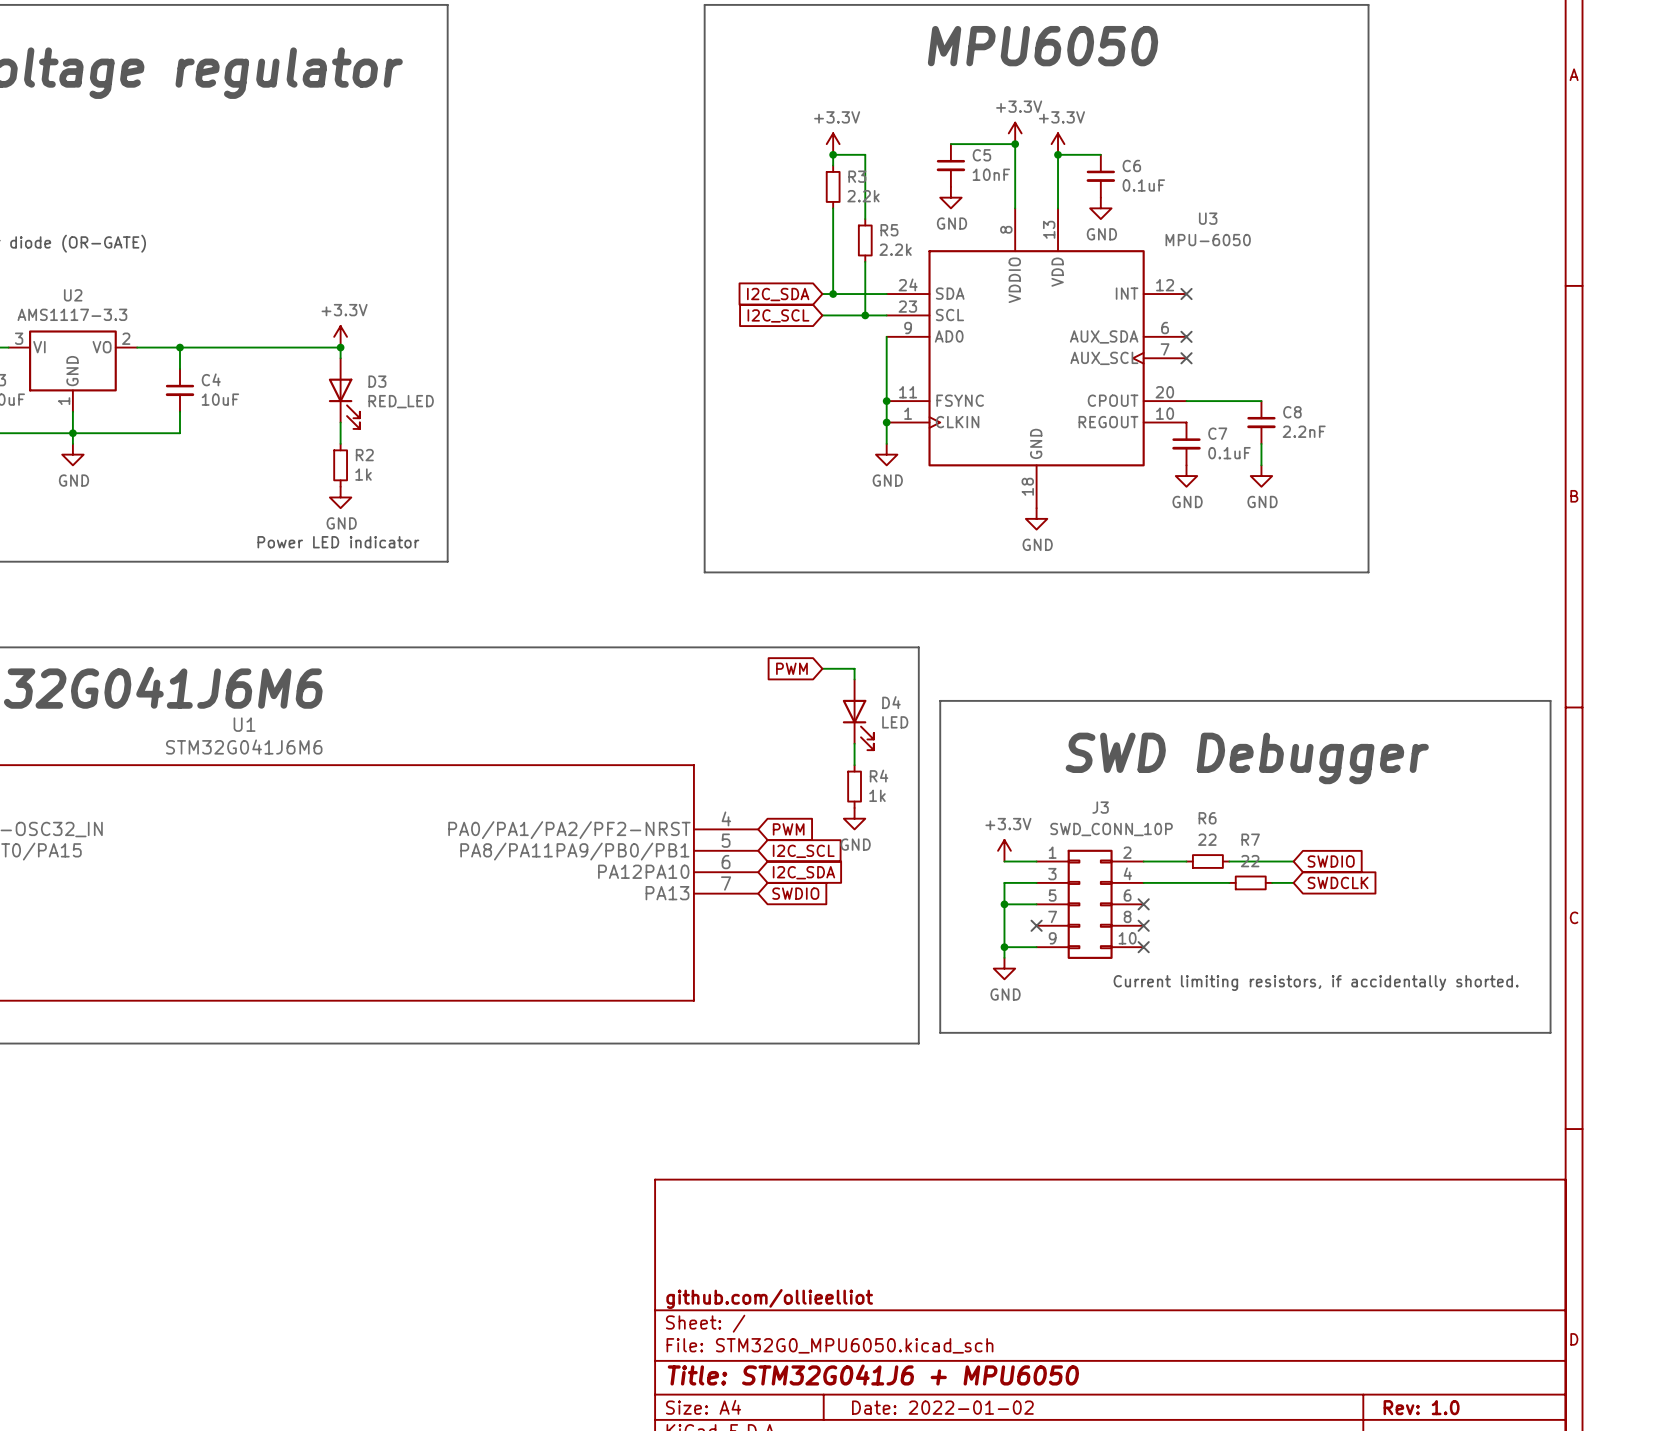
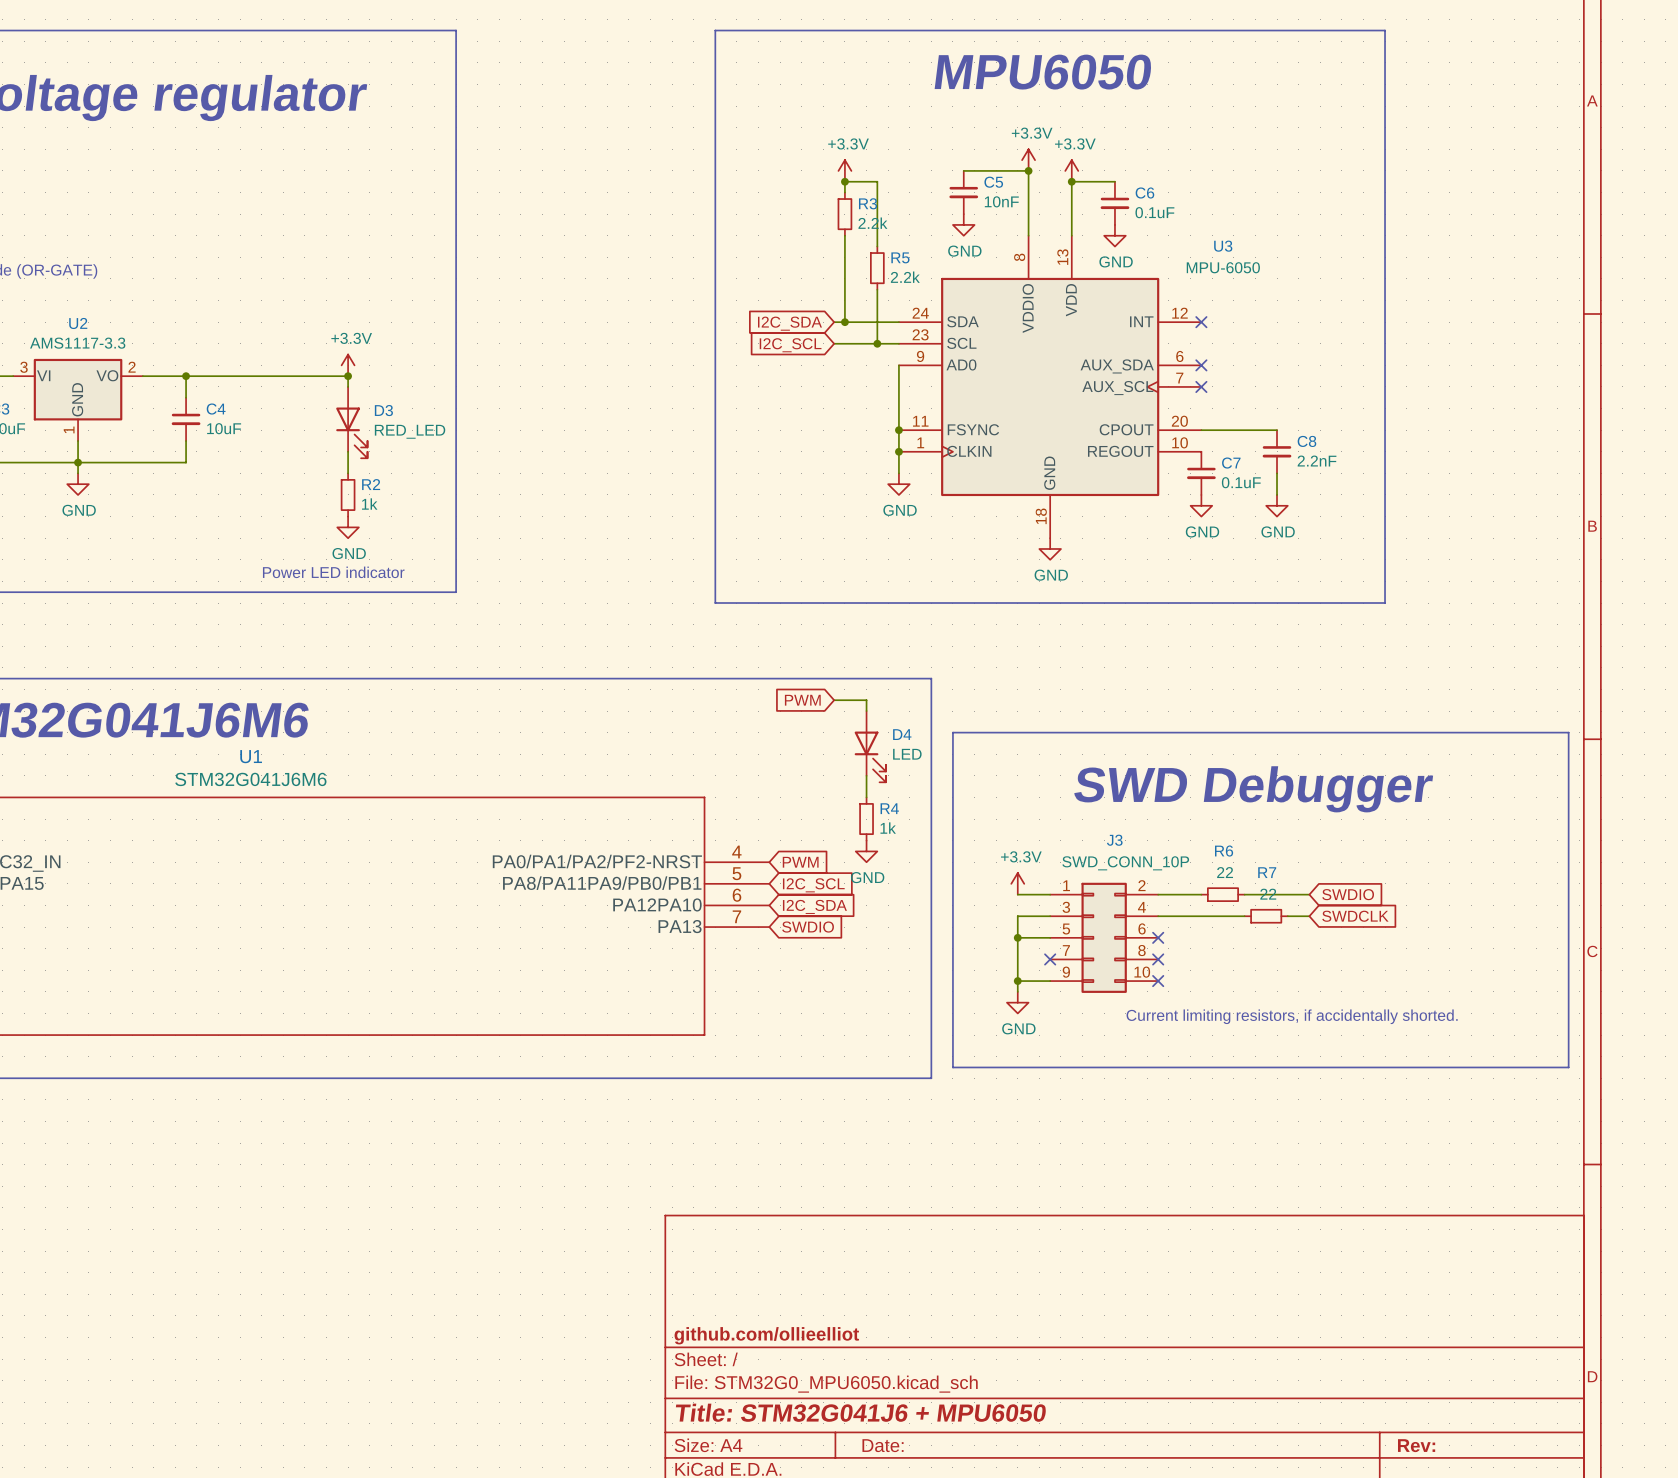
title block: Date: 2022-01-02 (942, 1407) -> Date: (883, 1445)
title block: Rev: 1.0 (1421, 1407) -> Rev: (1416, 1445)

